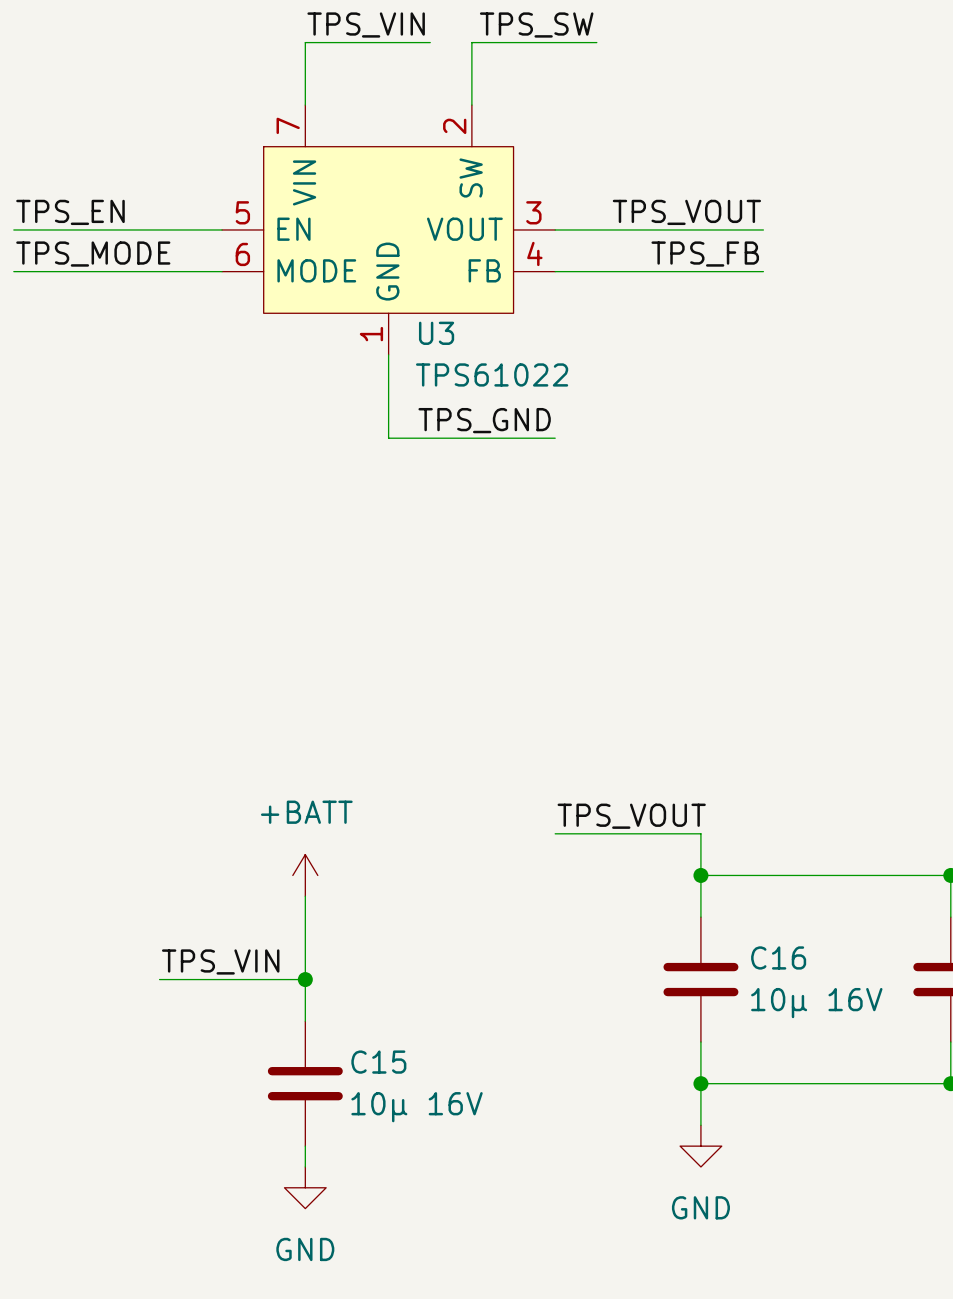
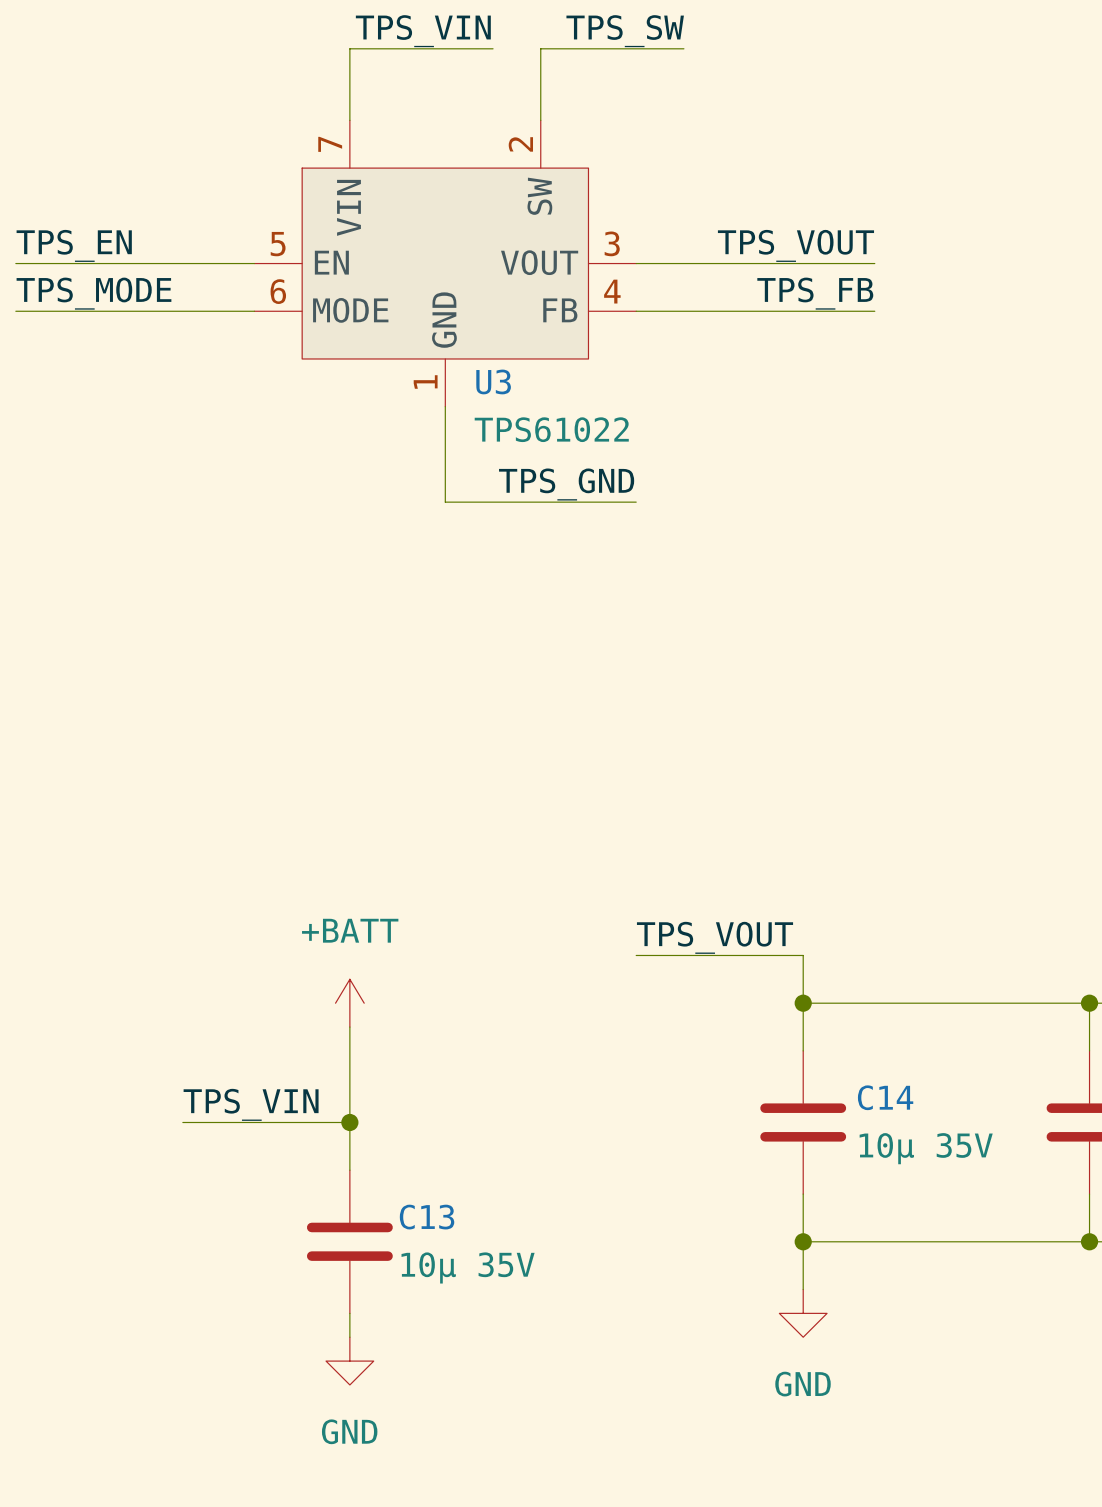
C16 name: C16 (778, 957) -> C14 (885, 1097)
C16 value: 10µ 16V (816, 1003) -> 10µ 35V (926, 1148)
C15 name: C15 (378, 1062) -> C13 (427, 1217)
C15 value: 10µ 16V (417, 1107) -> 10µ 35V (468, 1267)

